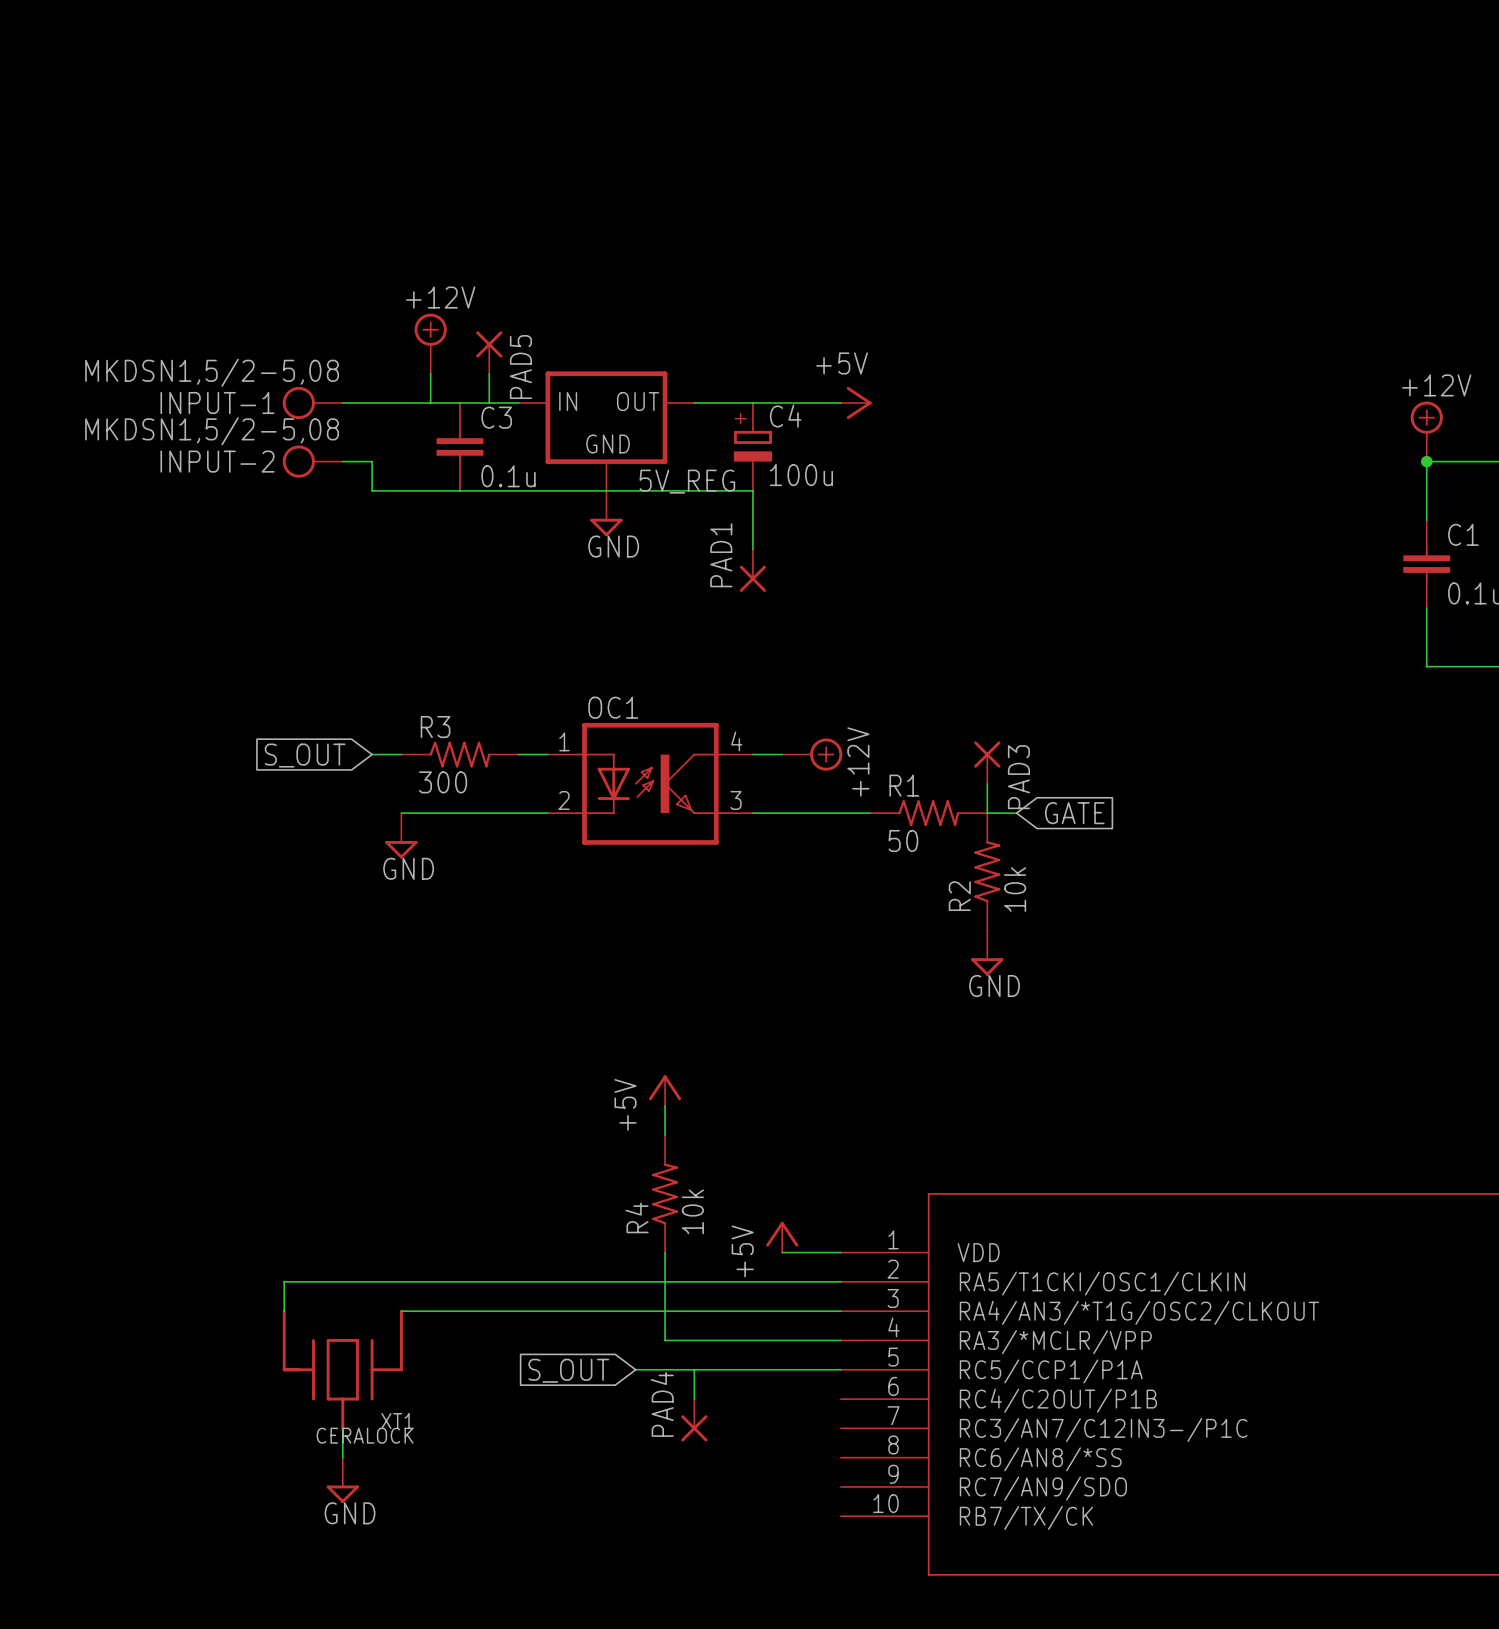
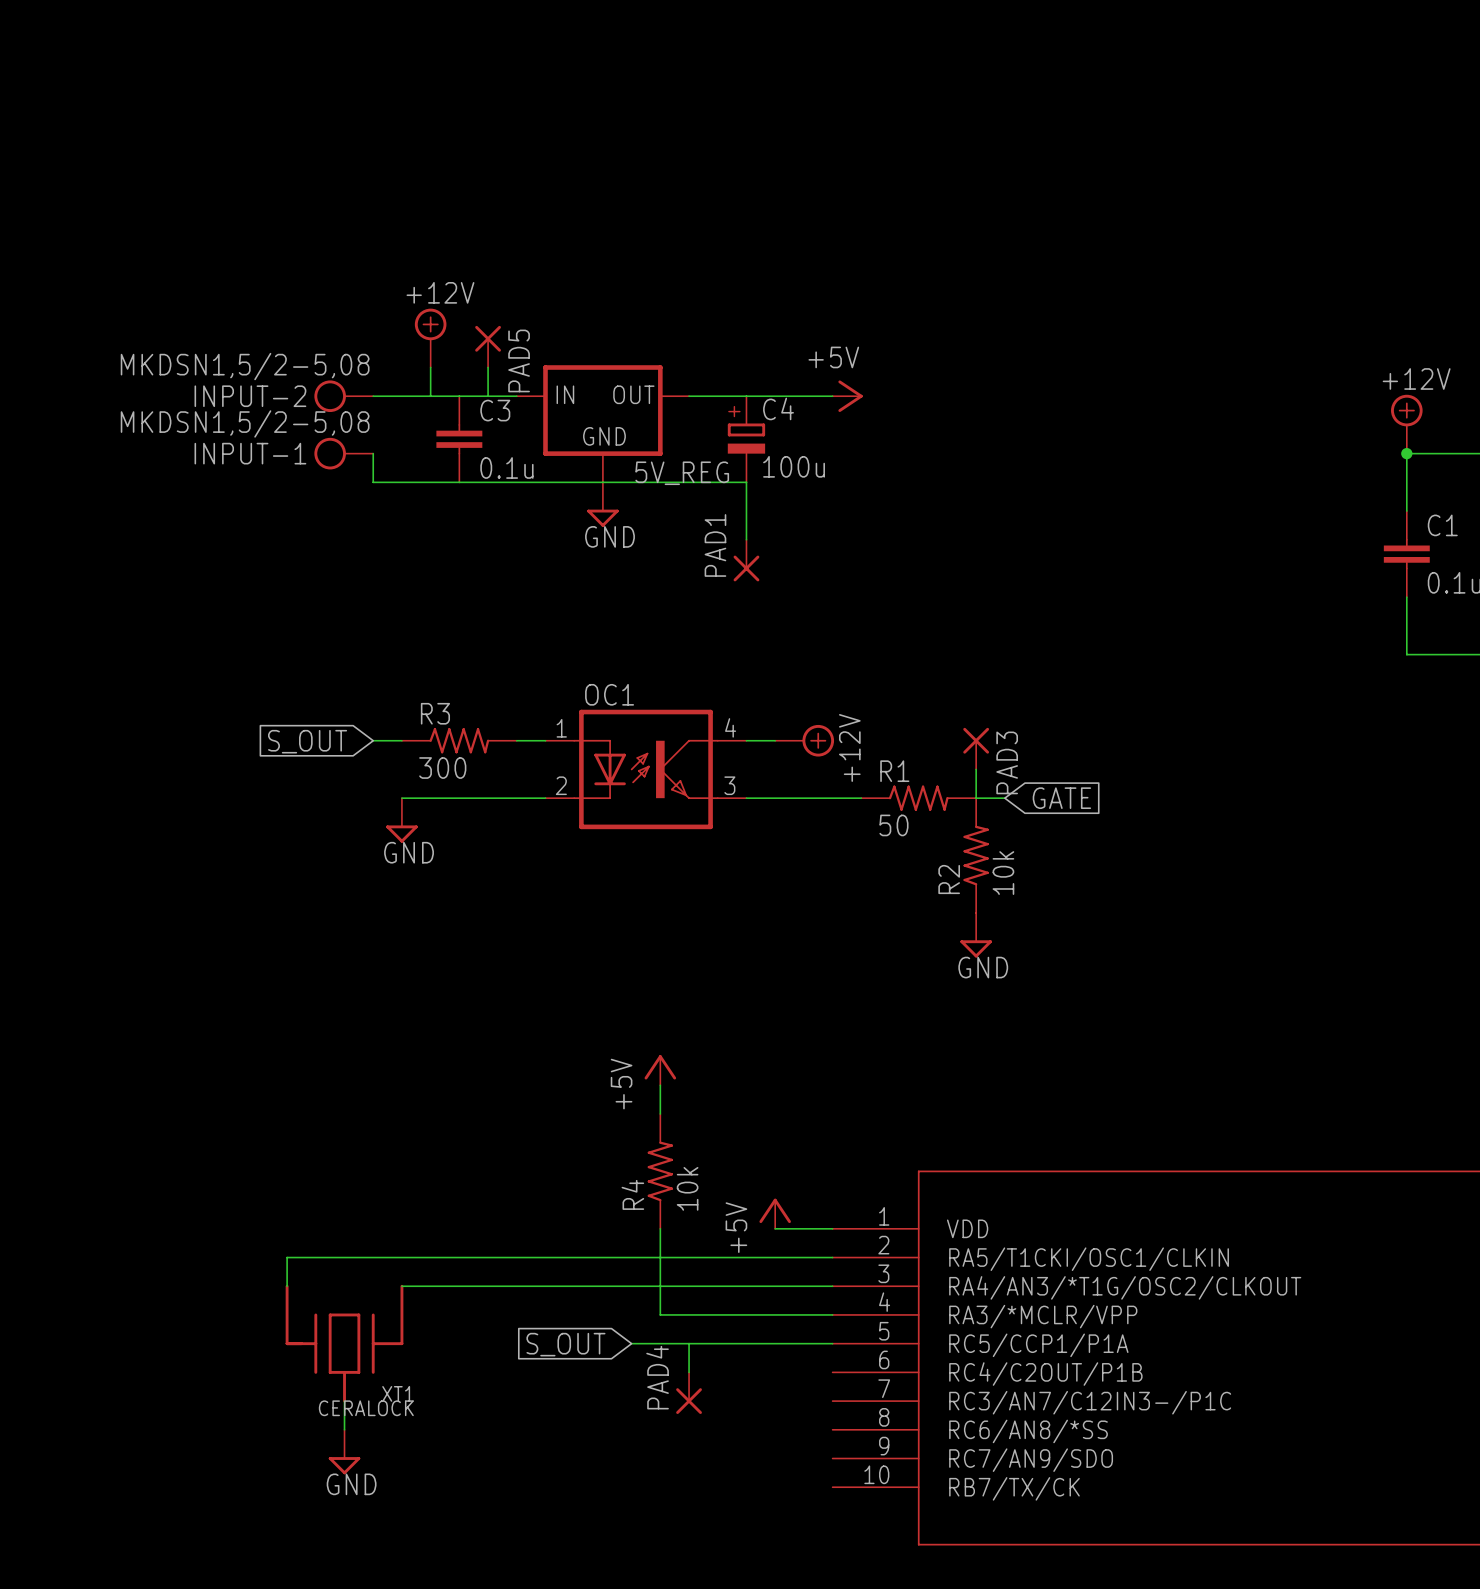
INPUT-1 position: (312, 403) -> (343, 453)
INPUT-2 position: (312, 461) -> (343, 396)

